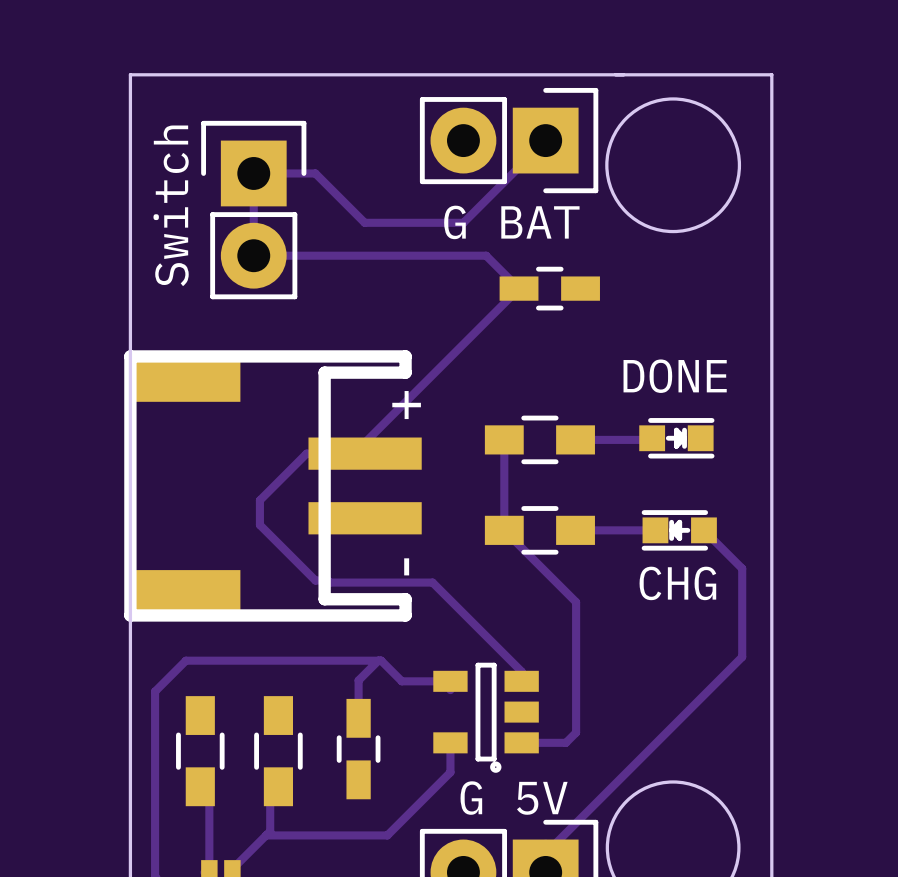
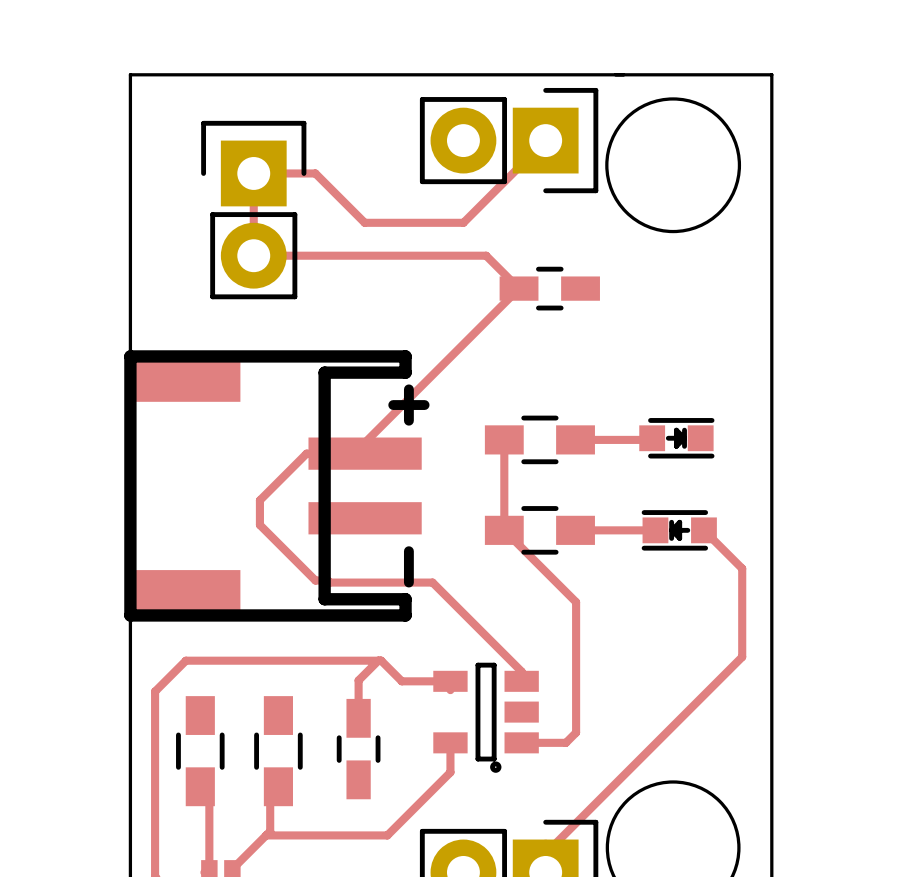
part value: Switch (171, 205) -> none
part value: G BAT (511, 222) -> none
part value: DONE (675, 376) -> none
part value: CHG (677, 583) -> none
part value: G 5V (514, 798) -> none

